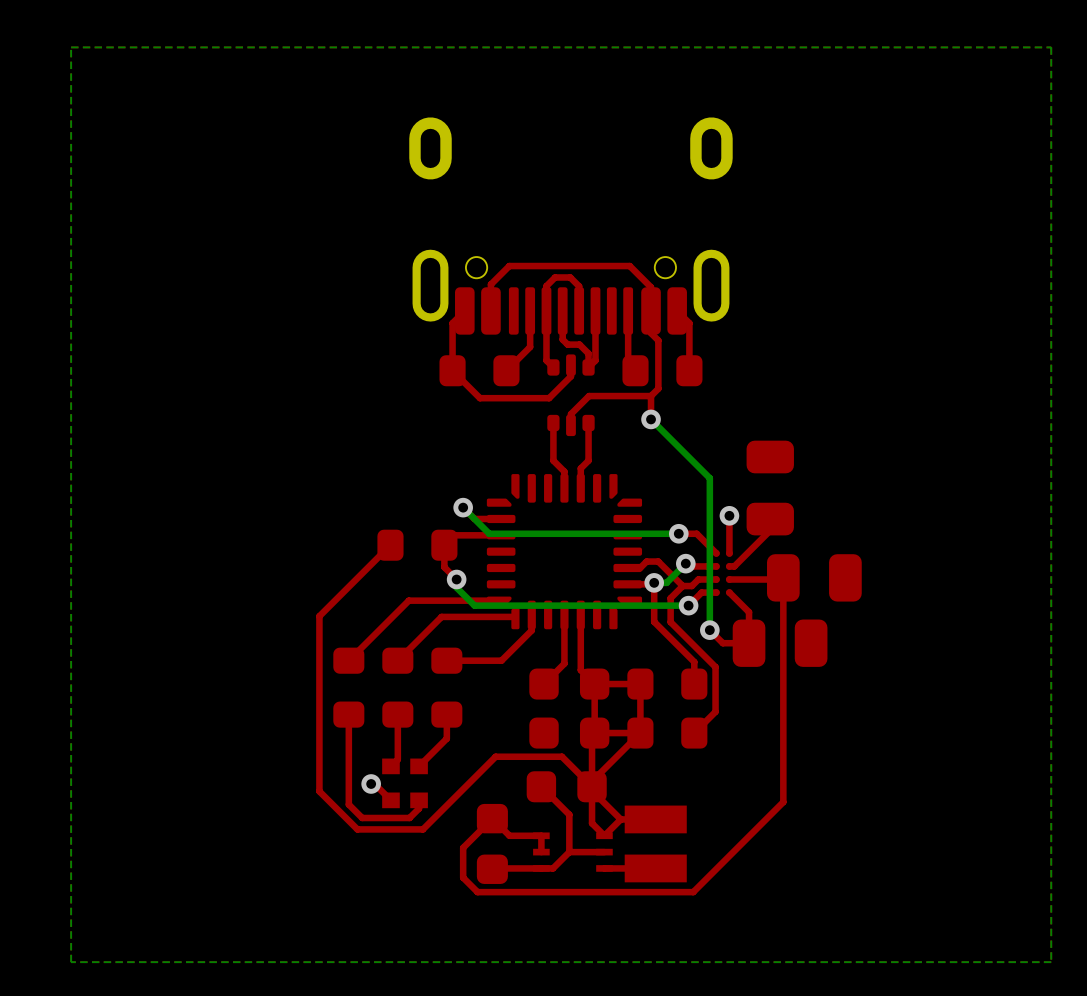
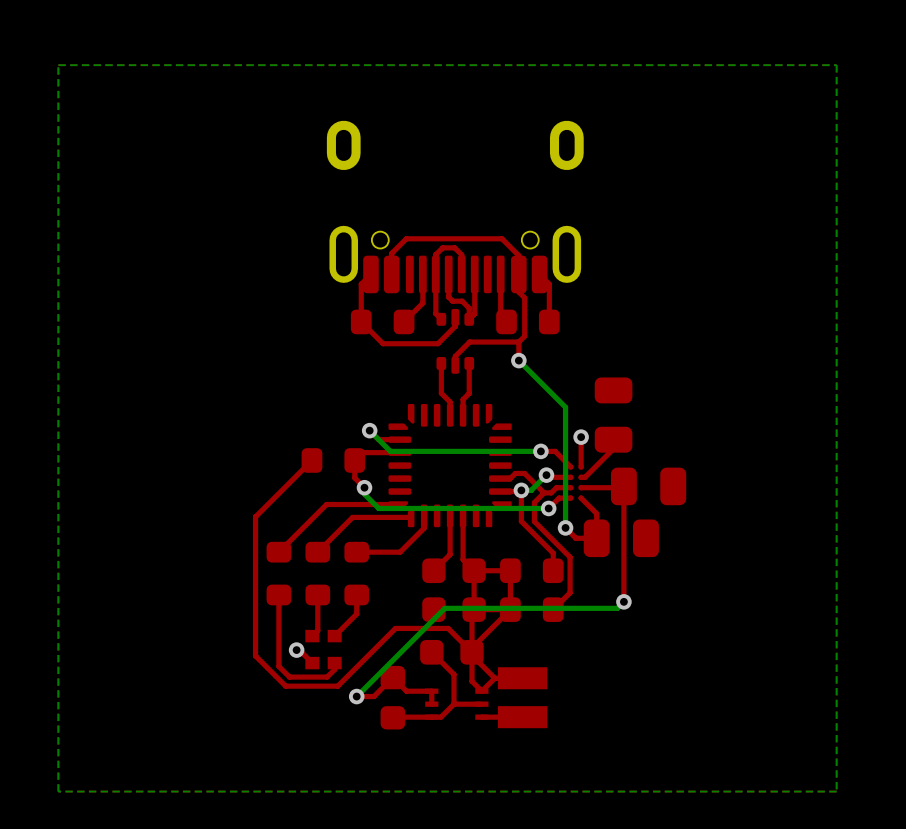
top track: (783, 723) (783, 802) (693, 892) (477, 892) (463, 877) (463, 847) (468, 842) -> (356, 696) (373, 696)
bottom track: none -> (623, 601) (617, 608) (444, 608) (356, 696)
via: none -> (623, 601)
via: none -> (356, 696)

